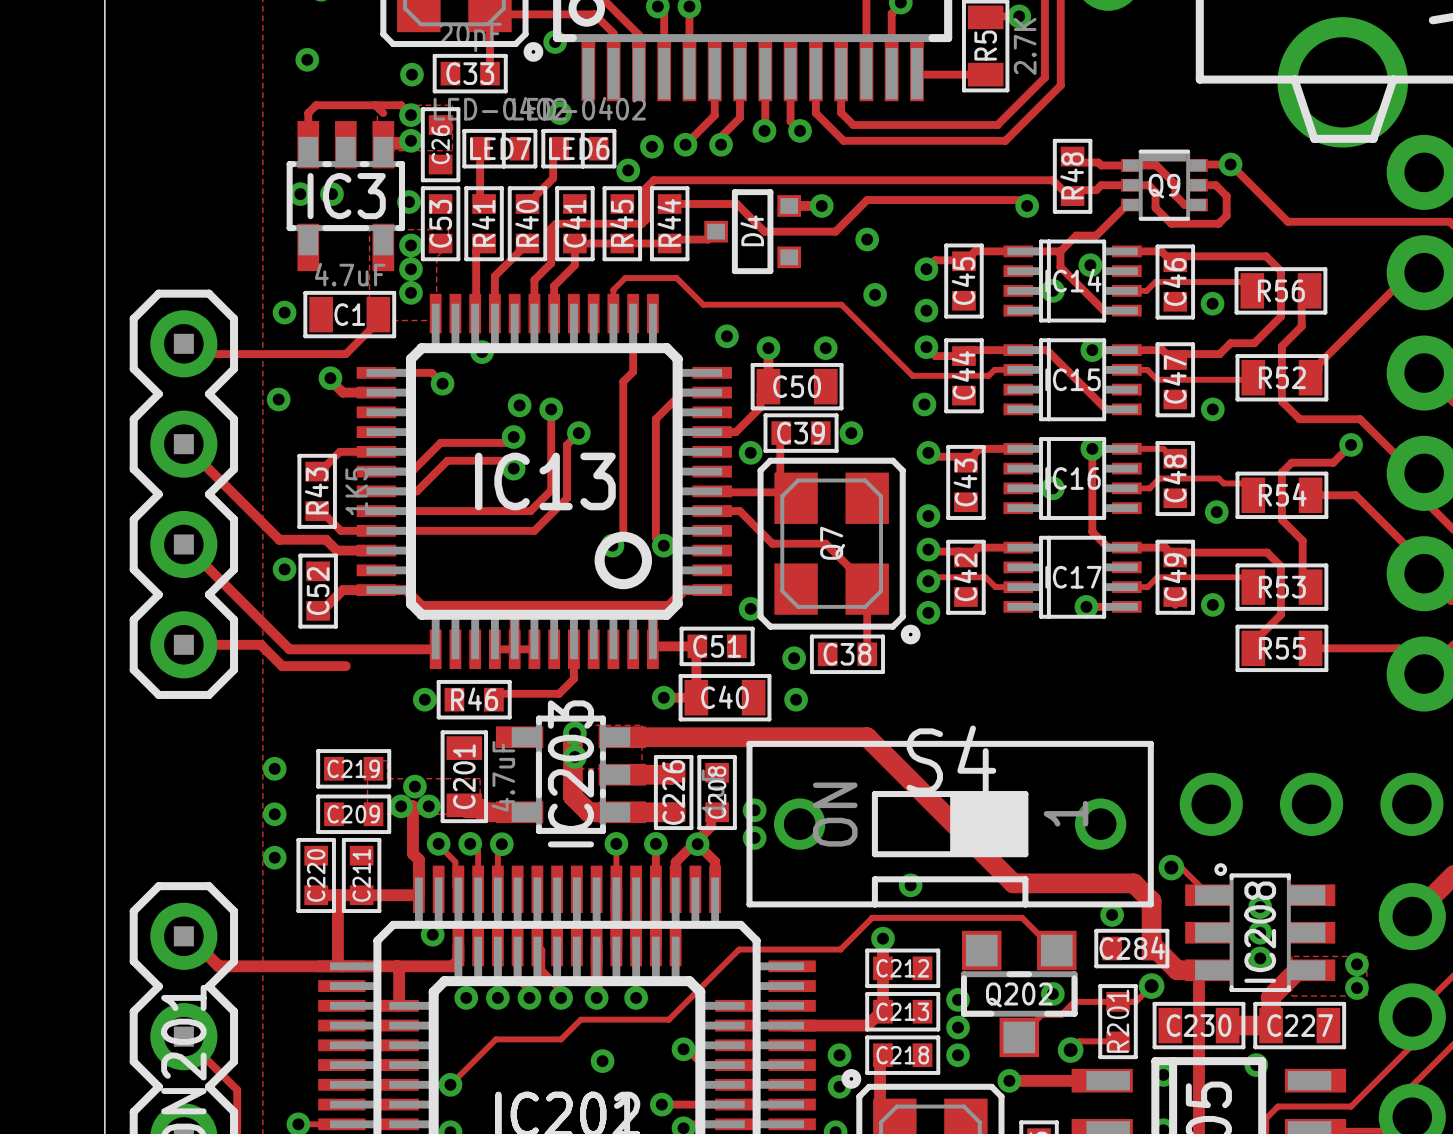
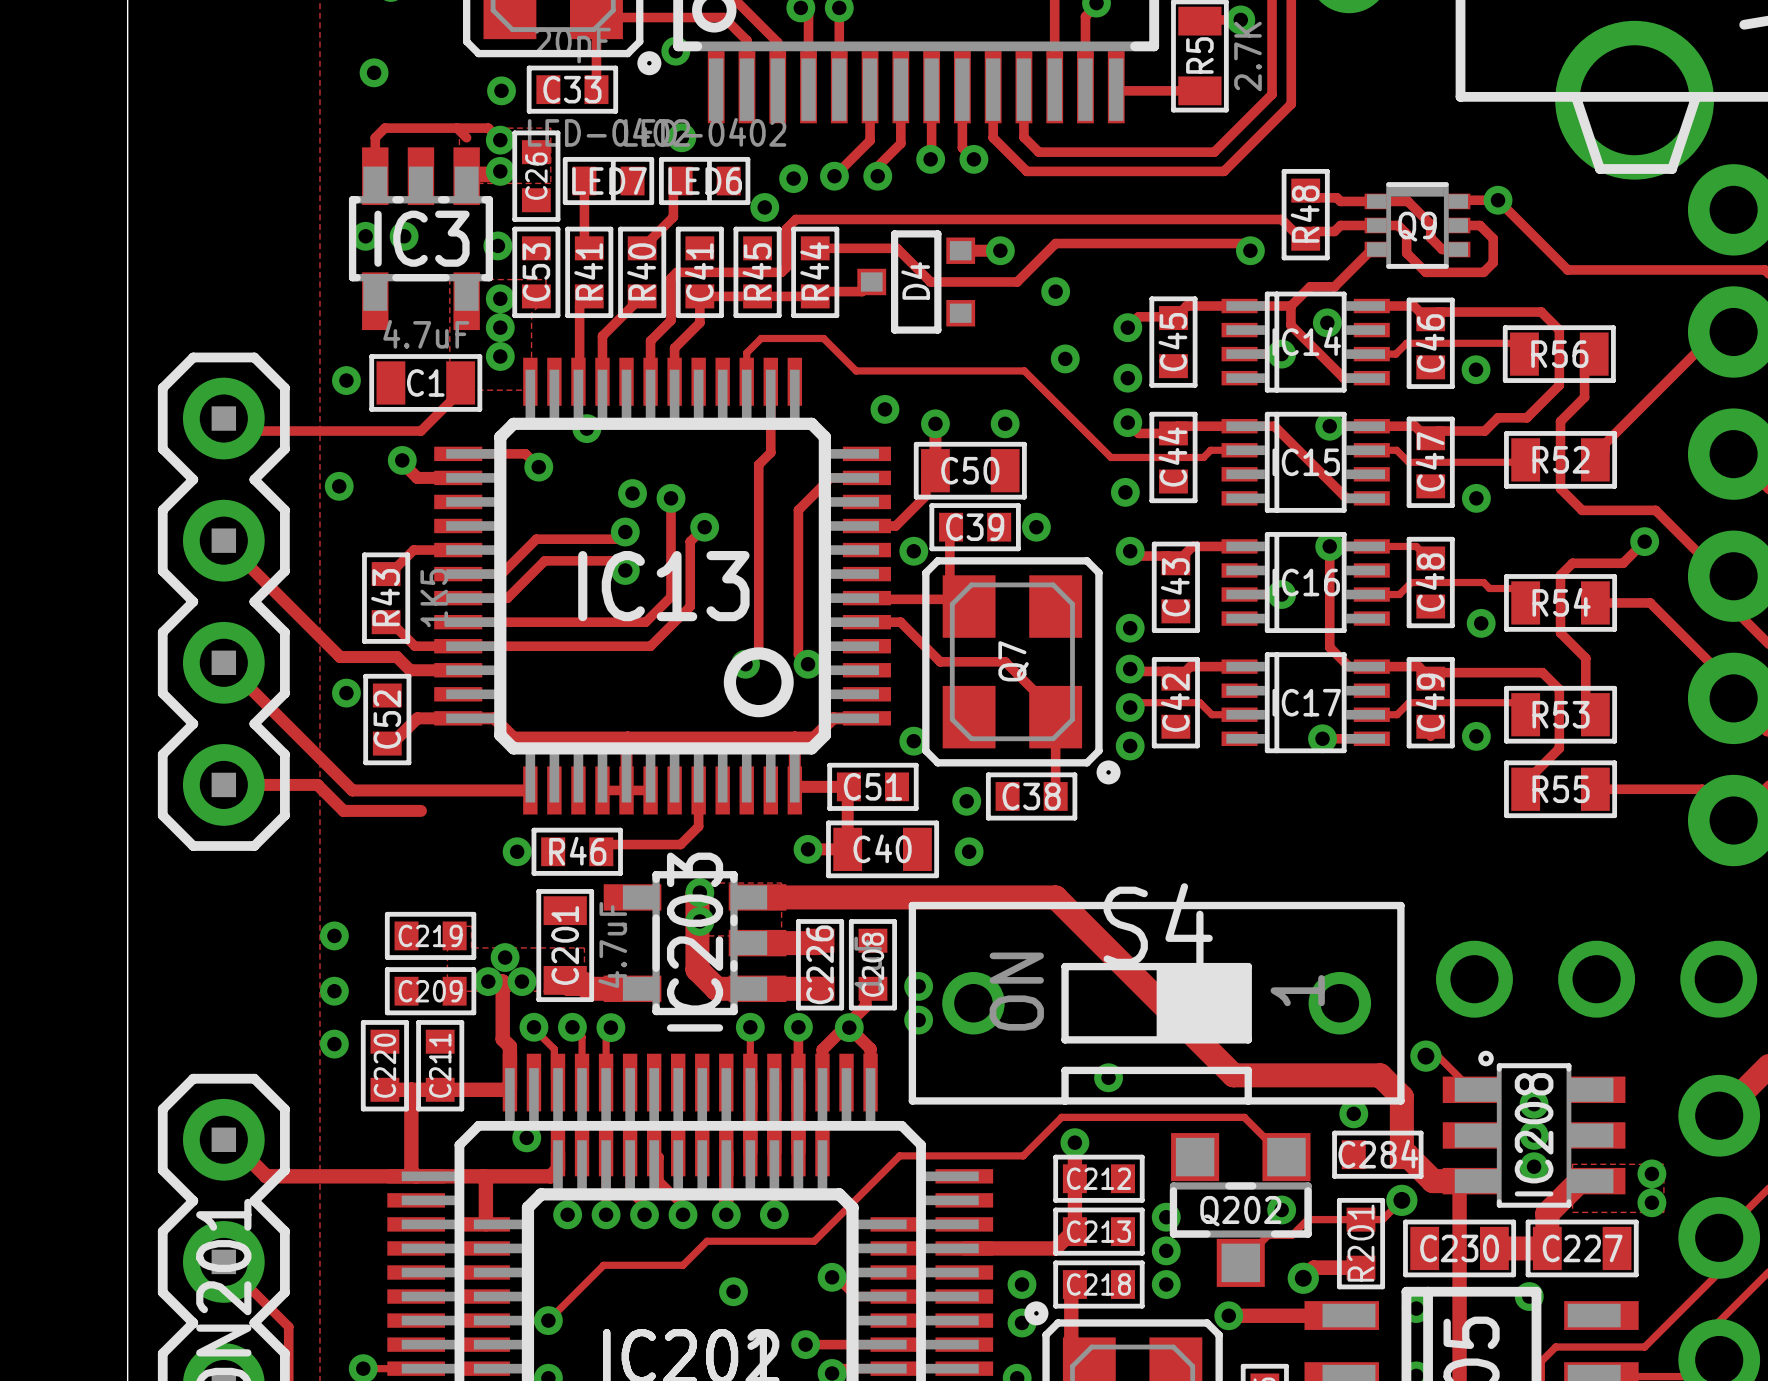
track width: thin (1118, 1041) (1079, 1041) (1070, 1050) -> thick (1360, 1267) (1313, 1267) (1303, 1278)

